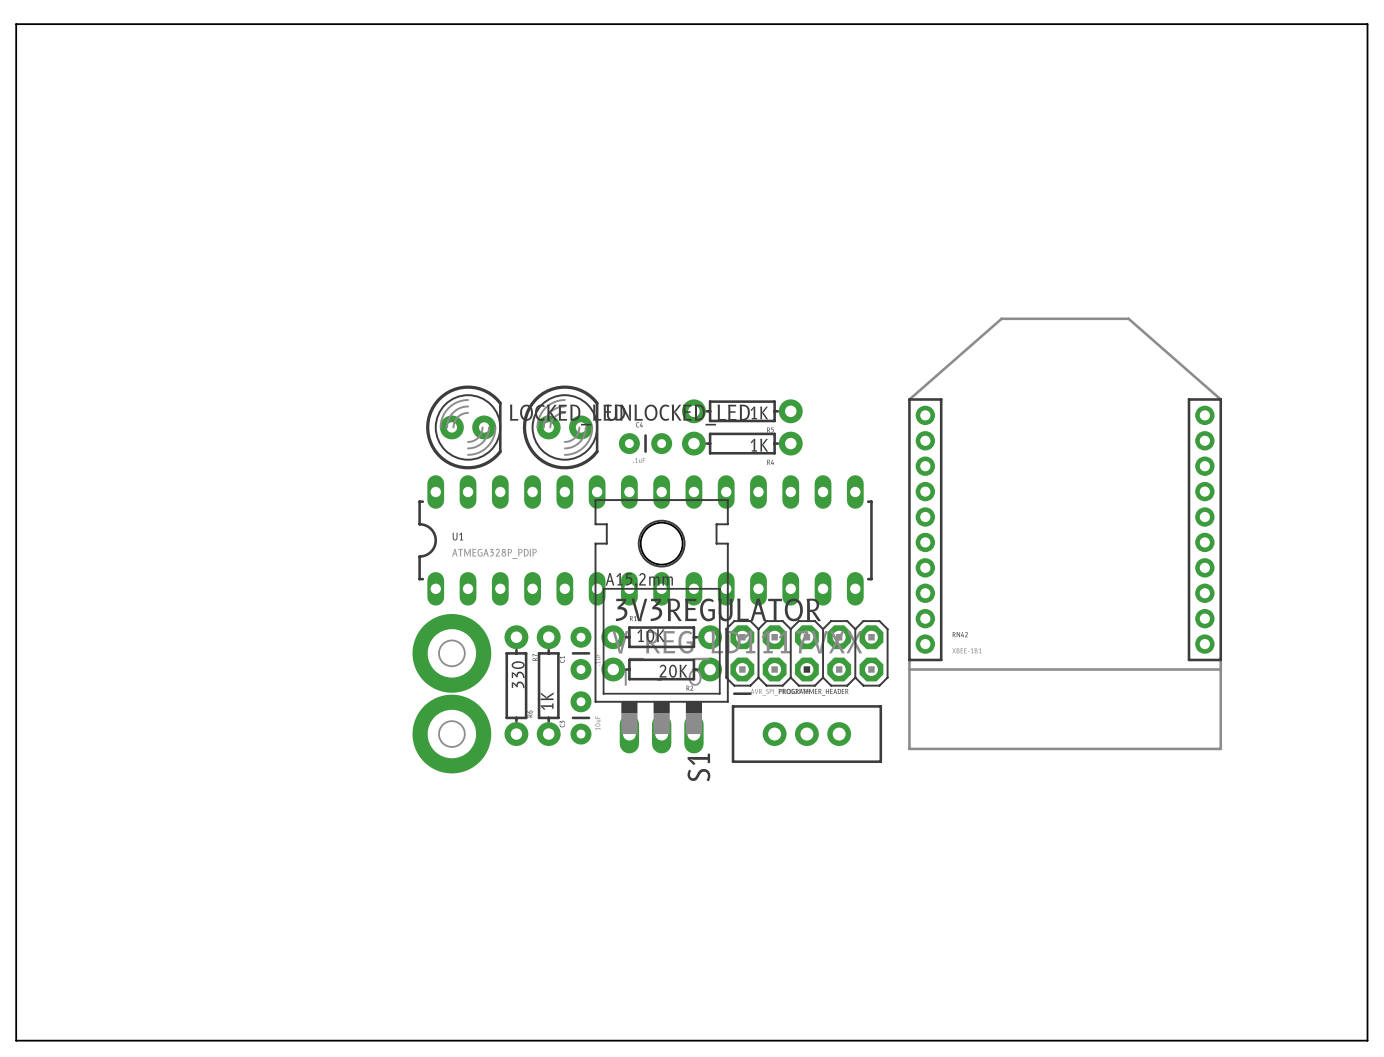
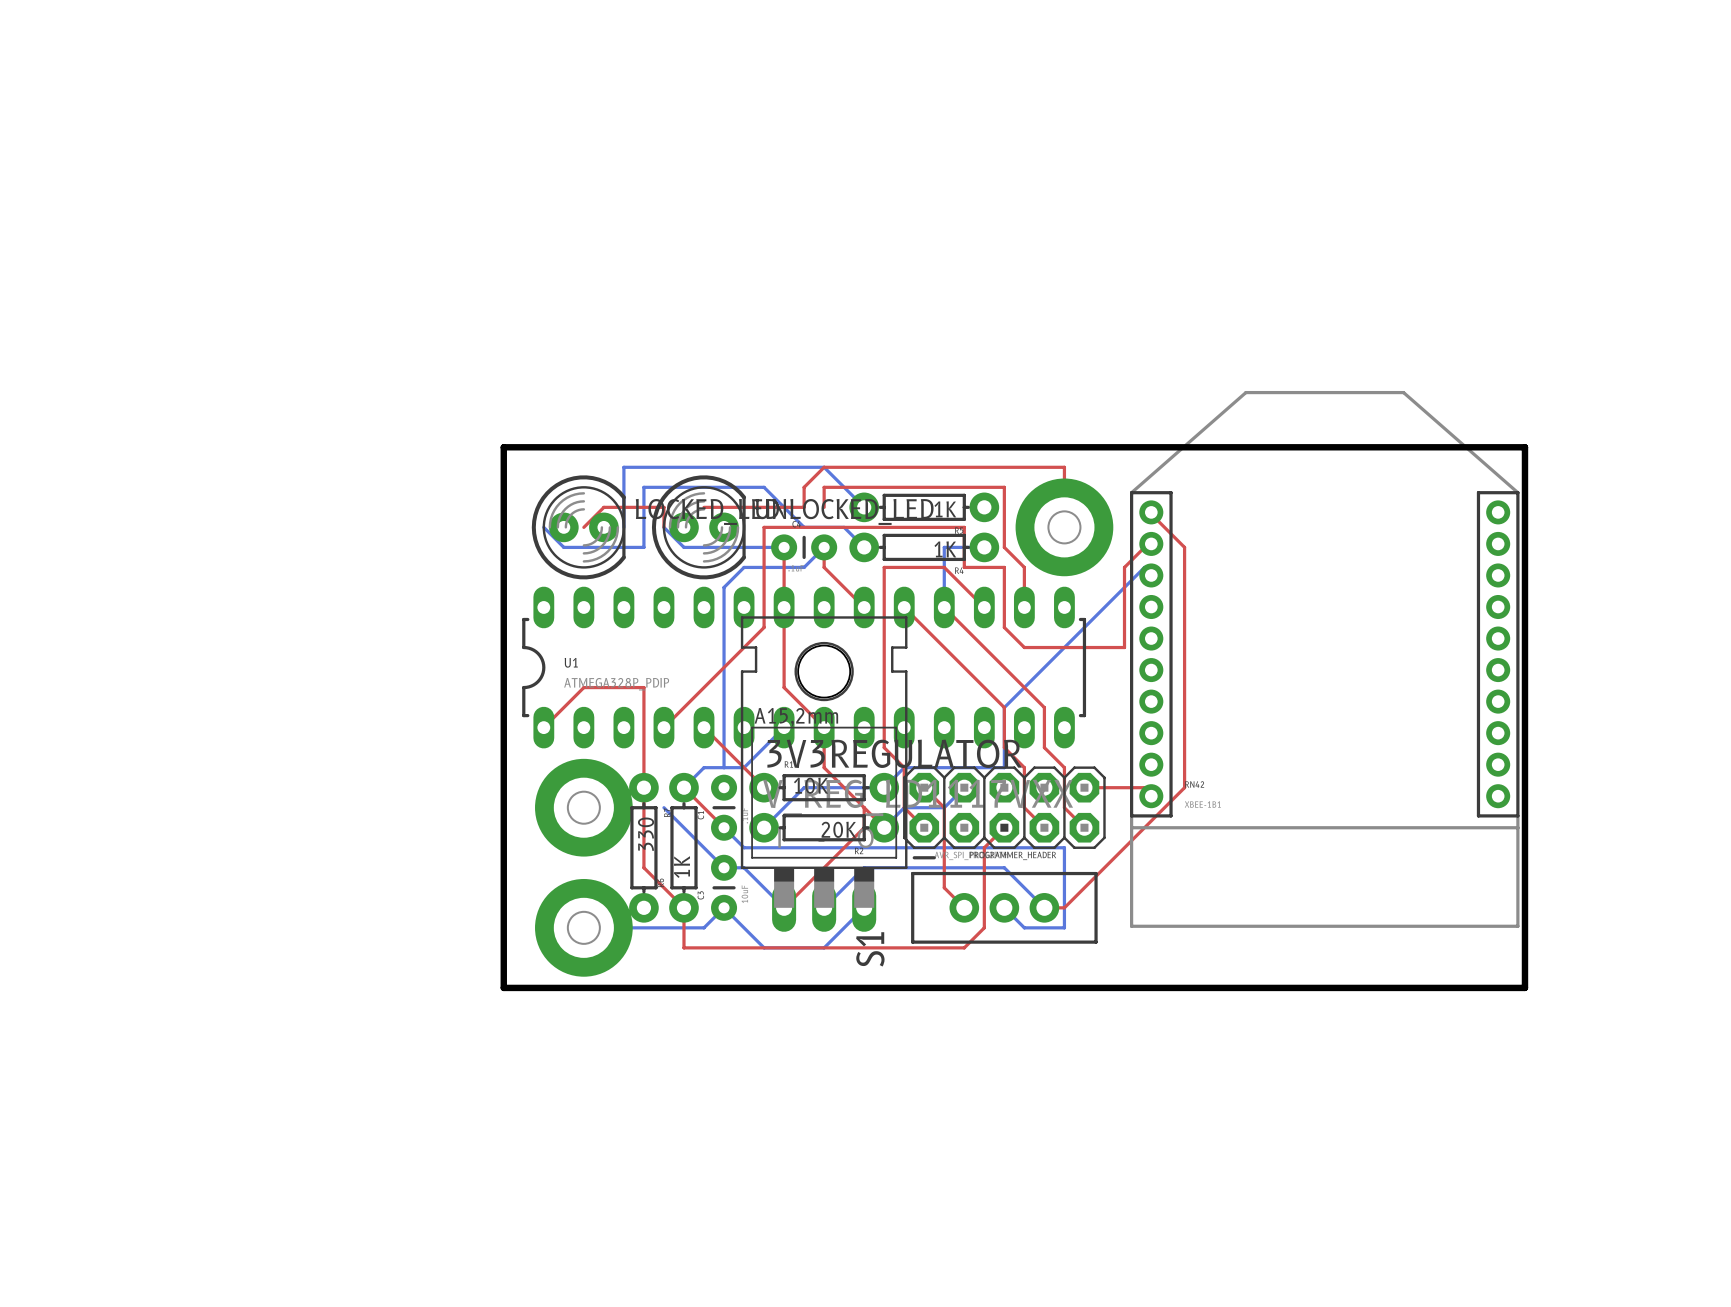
board edge: (16, 24) (1367, 24) (1367, 1040) (16, 1040) (16, 24) -> none
board edge: none -> (503, 447) (503, 987) (1524, 987) (1524, 447) (503, 447)
top track: none -> (704, 507) (804, 507) (804, 487) (824, 467) (1064, 467) (1064, 527)
top track: none -> (824, 507) (824, 487) (1004, 487) (1004, 547) (1024, 567) (1024, 607)
bottom track: none -> (864, 507) (824, 467) (623, 467) (623, 527)
top track: none -> (1151, 512) (1144, 507) (1184, 547) (1184, 787) (1064, 907) (1044, 907)
bottom track: none -> (543, 527) (563, 547) (643, 547) (643, 487) (764, 487) (804, 527) (844, 527) (864, 547)
top track: none -> (583, 527) (603, 507) (663, 507) (663, 527)
bottom track: none -> (663, 527) (683, 547) (784, 547)
part: none -> (1064, 527)
top track: none -> (1151, 543) (1144, 547) (1124, 567) (1124, 647) (1024, 647) (1004, 627) (1004, 567) (964, 567) (964, 527) (764, 527) (764, 627) (663, 727)
top track: none -> (784, 547) (784, 687) (824, 727) (824, 767) (884, 827)
bottom track: none -> (824, 547) (804, 567) (744, 567) (724, 587) (724, 767)
top track: none -> (824, 547) (824, 567) (864, 607)
bottom track: none -> (984, 547) (944, 547) (944, 607)
bottom track: none -> (1151, 575) (1144, 567) (1004, 707) (1004, 767) (904, 767) (884, 787) (804, 787) (764, 827)
top track: none -> (904, 607) (1004, 707) (1004, 747) (1024, 767) (1024, 807) (1044, 827)
top track: none -> (944, 607) (1044, 707) (1044, 747) (1064, 767) (1064, 807) (1084, 827)
top track: none -> (984, 607) (944, 567) (884, 567) (884, 747) (904, 767) (904, 807) (924, 827)
top track: none -> (543, 727) (583, 687) (643, 687) (643, 867) (683, 907) (683, 947) (964, 947) (984, 927) (984, 847) (1004, 827)
top track: none -> (704, 727) (764, 787)
bottom track: none -> (784, 727) (744, 767) (704, 767) (683, 787)
top track: none -> (683, 787) (724, 827)
top track: none -> (924, 787) (944, 807) (944, 887) (964, 907)
bottom track: none -> (964, 787) (944, 807) (904, 807) (884, 827)
top track: none -> (1084, 787) (1144, 787) (1151, 796)
part position: (451, 653) -> (583, 807)
bottom track: none -> (663, 807) (724, 867) (744, 867) (784, 907)
top track: none -> (864, 807) (864, 827) (784, 907)
bottom track: none -> (724, 827) (744, 847) (1064, 847) (1064, 927) (1024, 927) (1004, 907)
part position: (451, 734) -> (583, 927)
bottom track: none -> (824, 907) (864, 867) (1004, 867) (1044, 907)
bottom track: none -> (864, 907) (824, 947) (764, 947) (724, 907) (704, 927) (583, 927)

